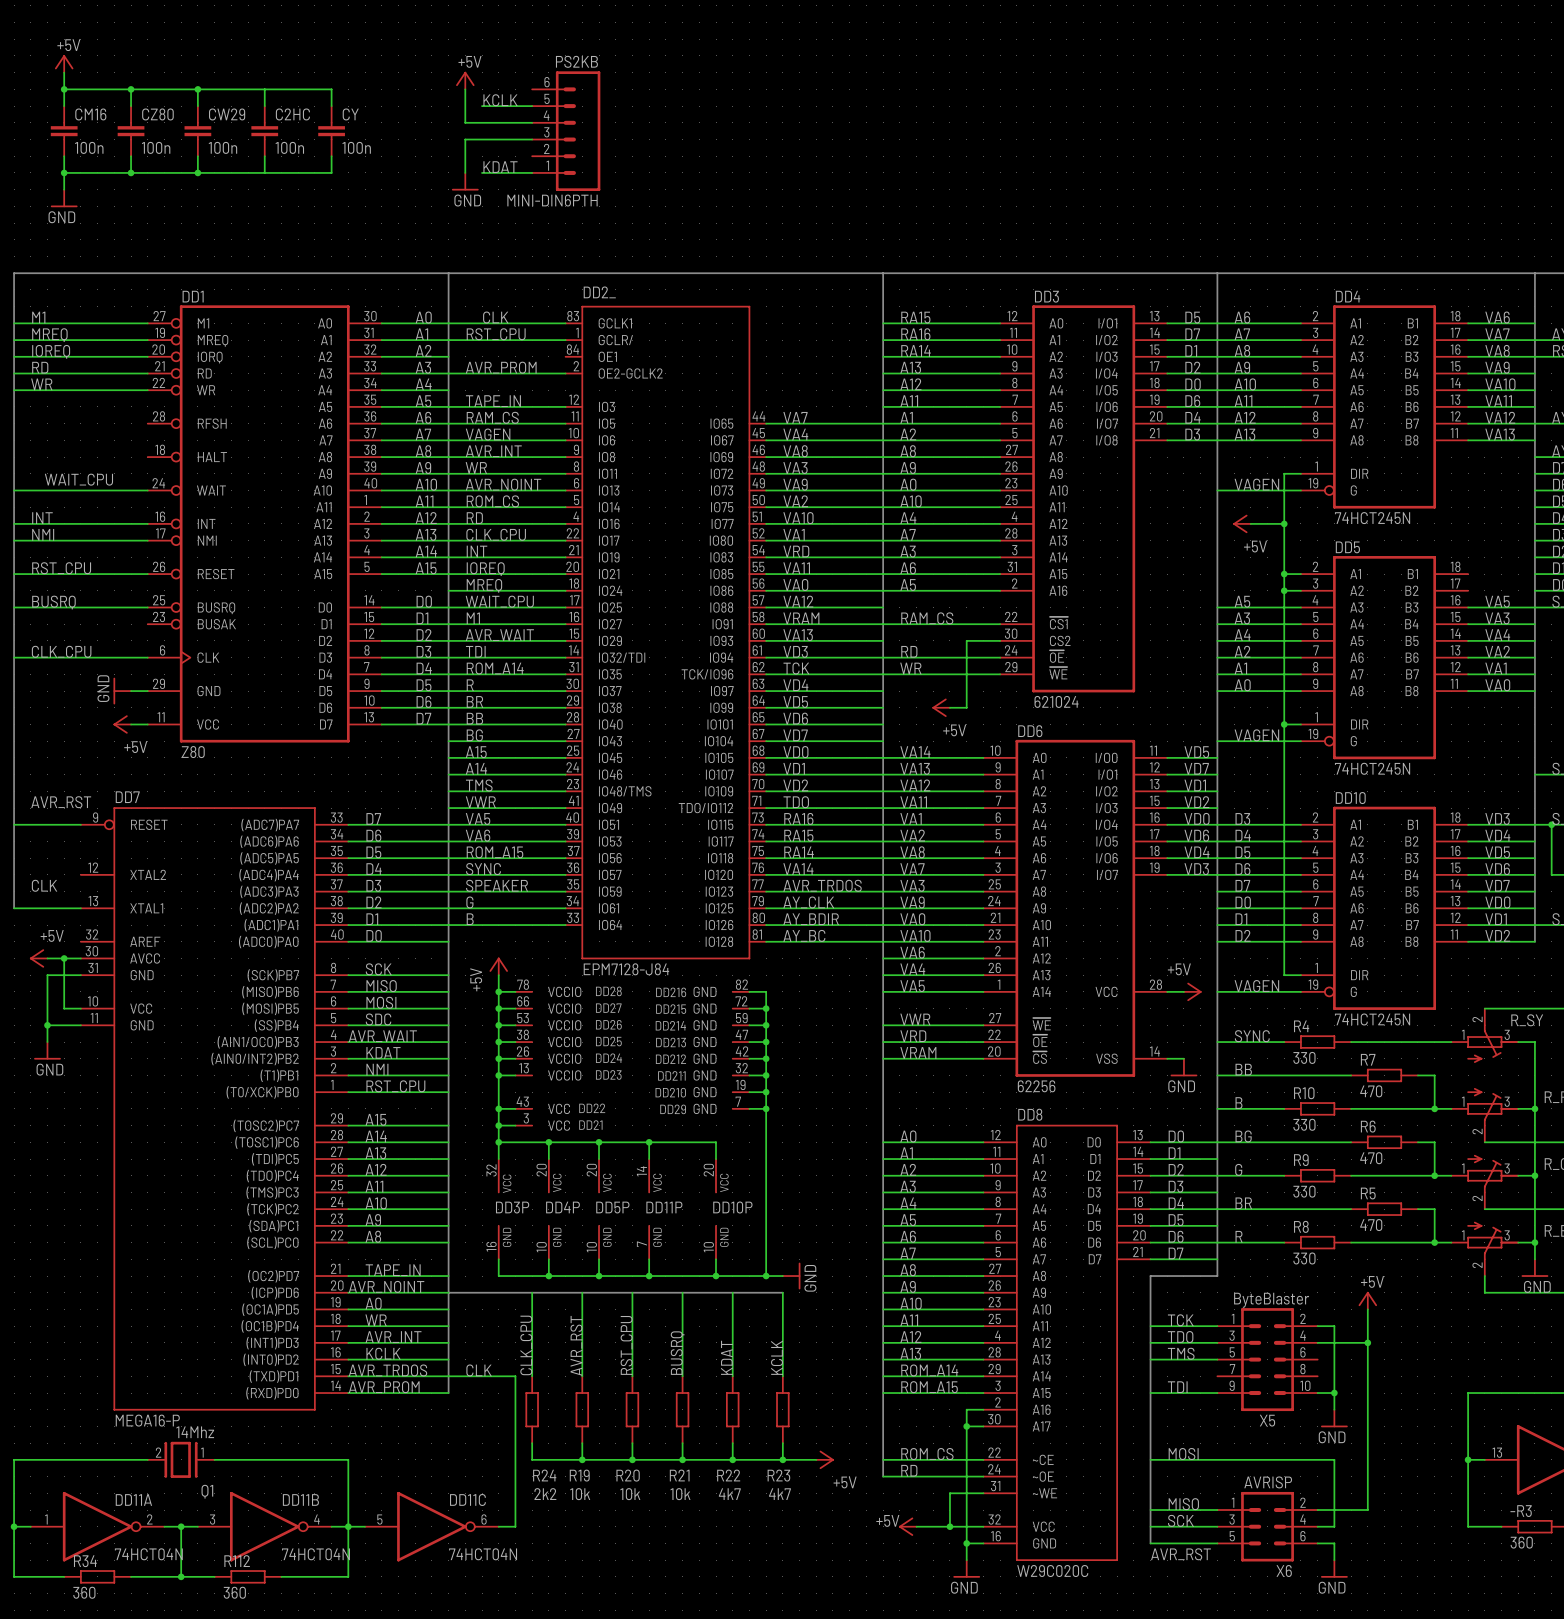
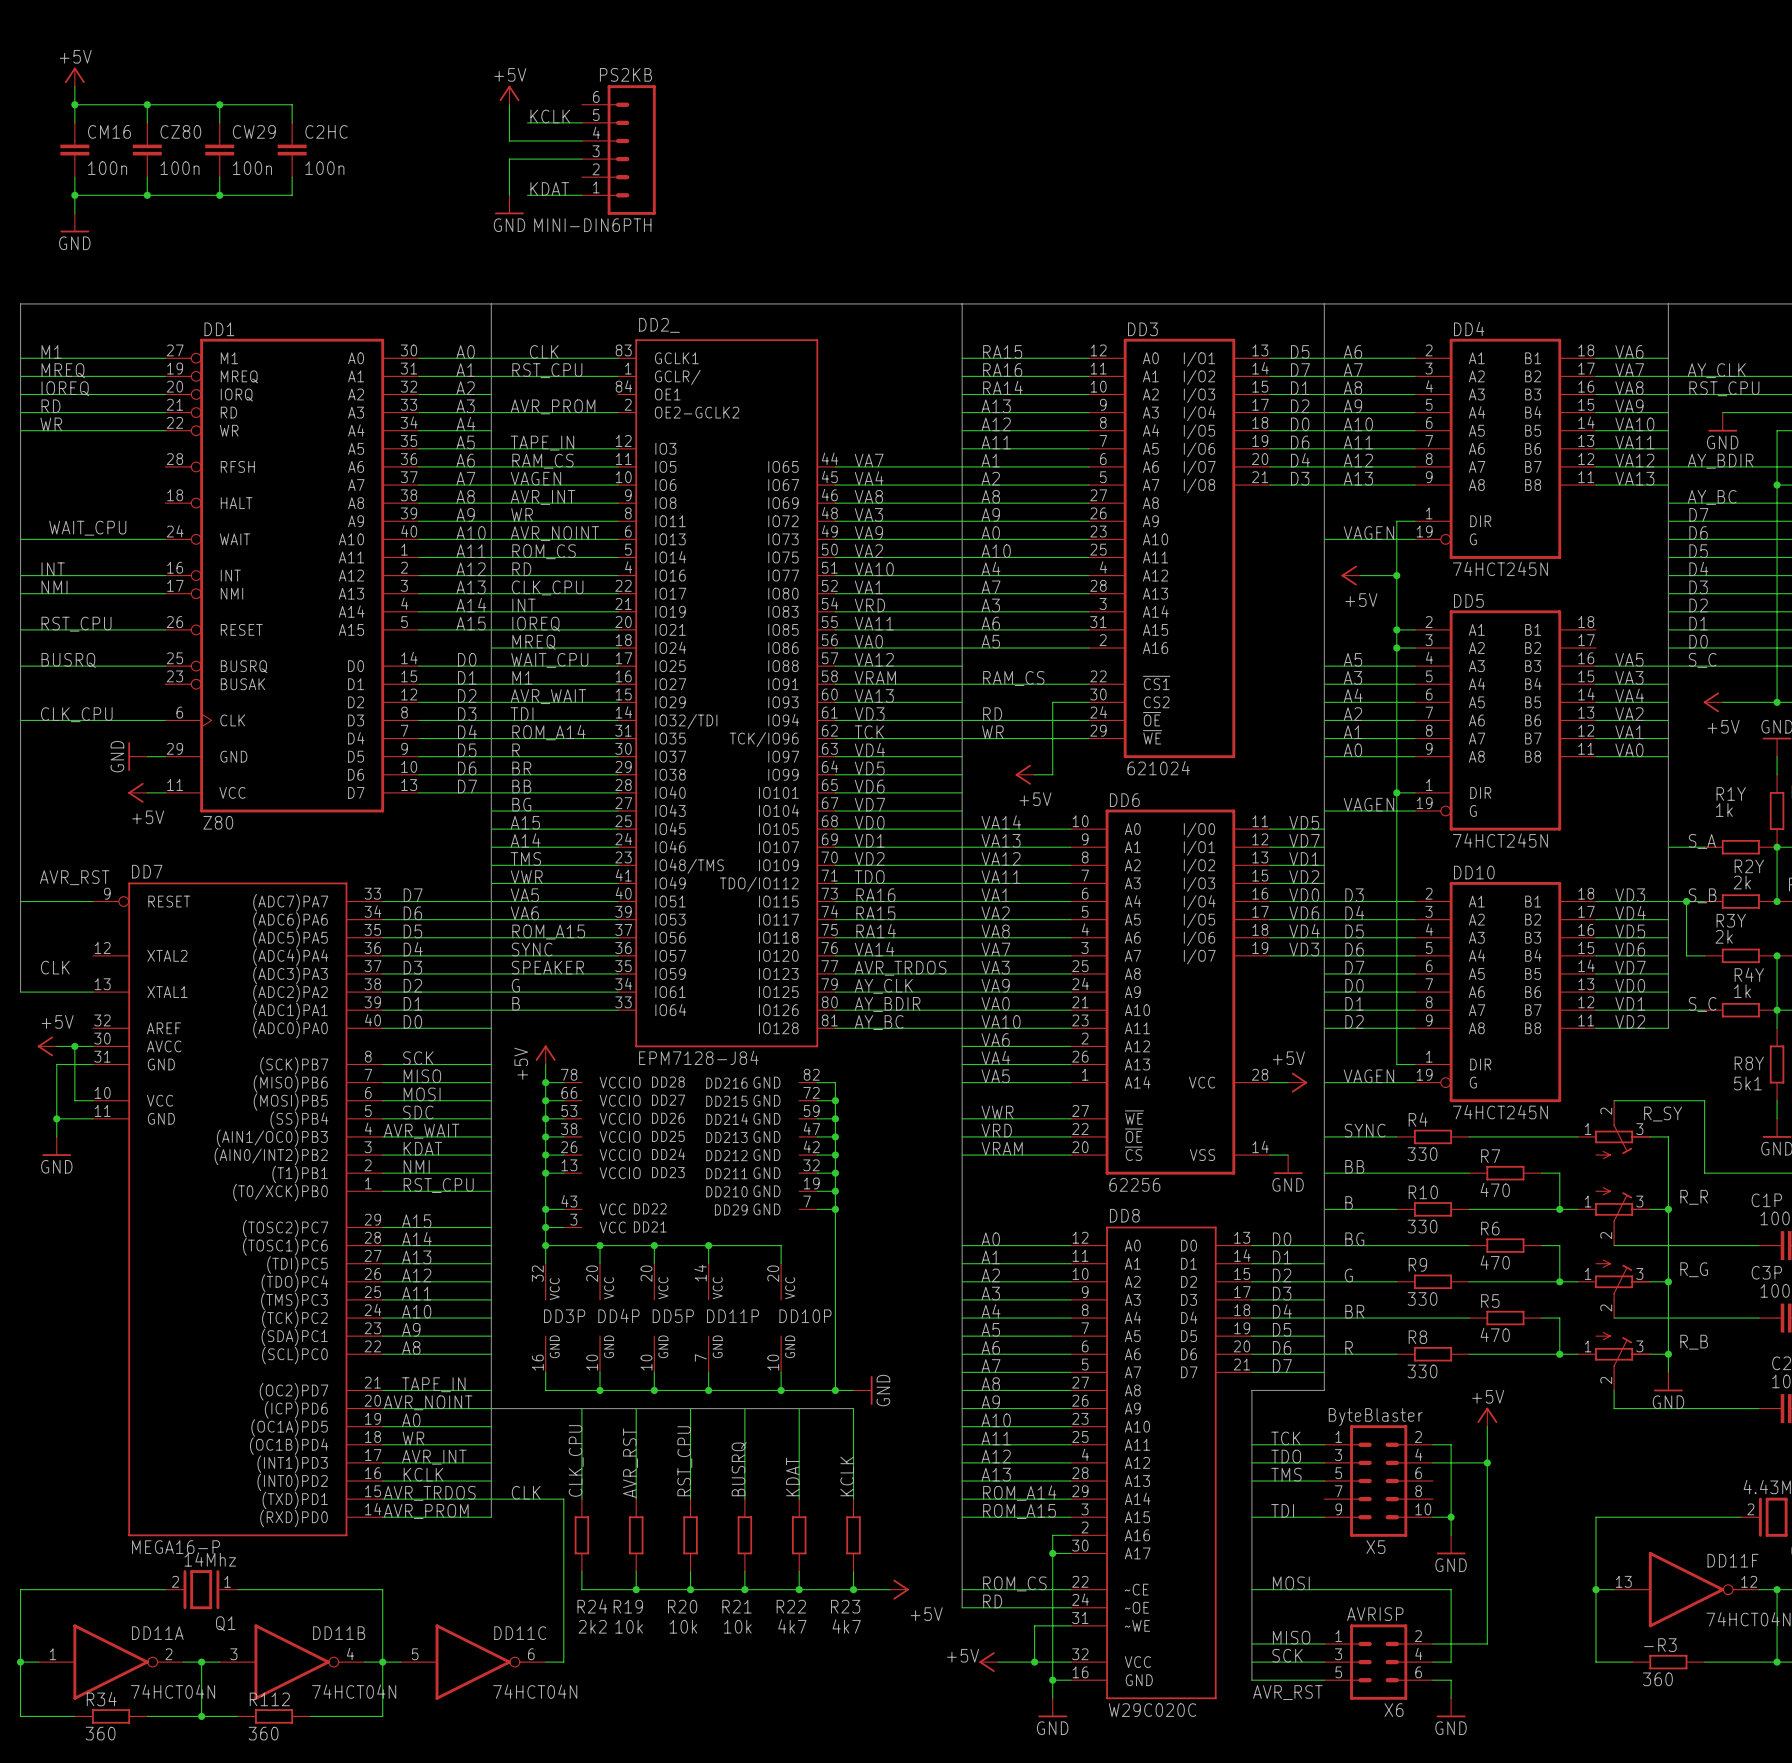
wire: (264, 89) (331, 89) (331, 106) -> none
CY: 100n (331, 131) -> none
wire: (331, 156) (331, 172) (264, 172) -> none

